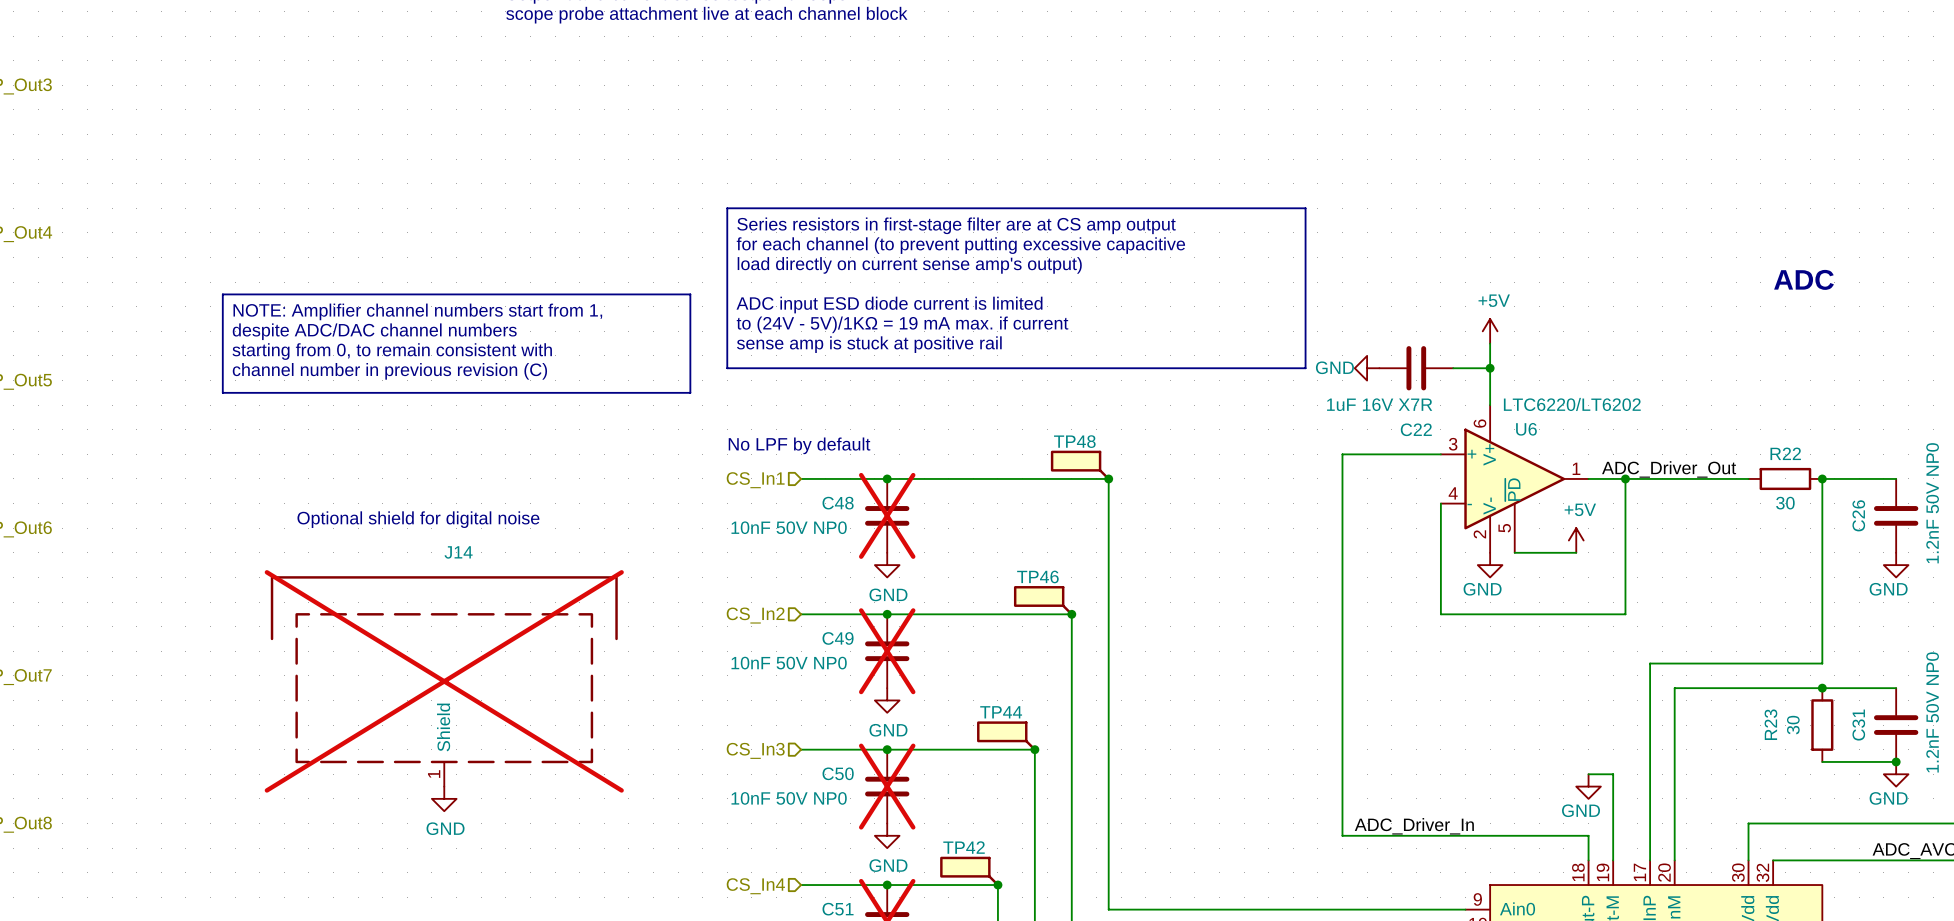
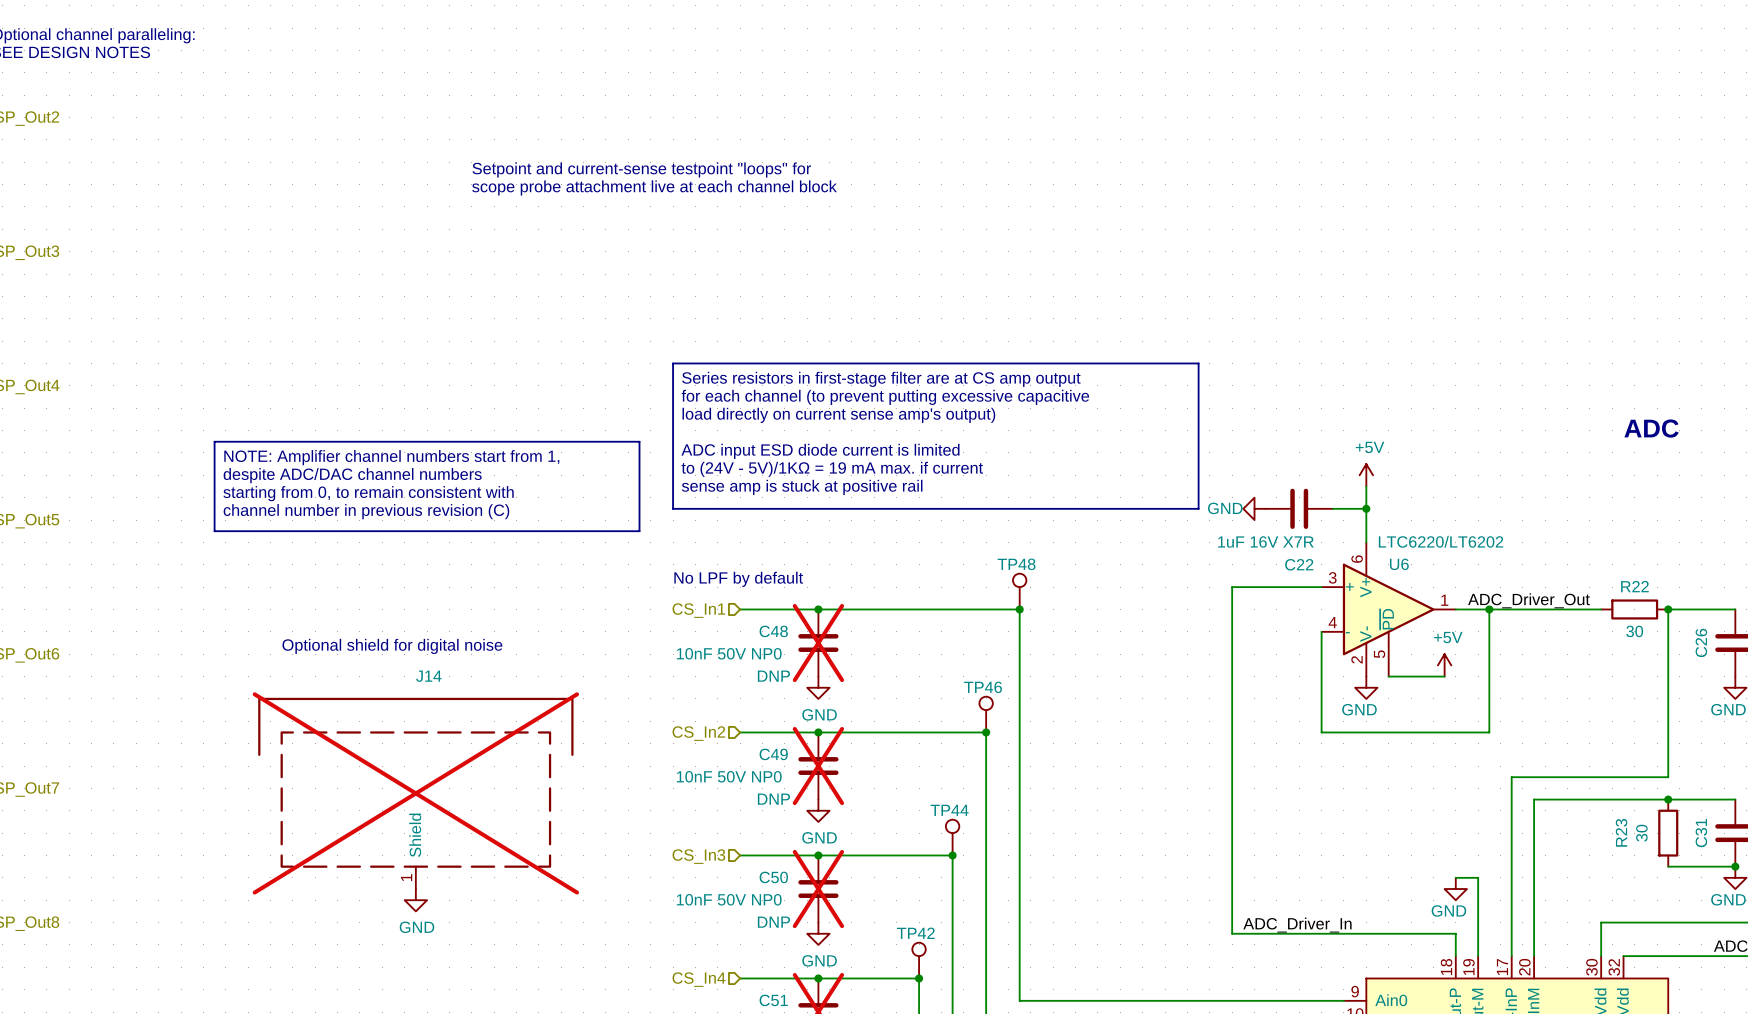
TP48 symbol: [1050, 450, 1110, 481] -> [1012, 573, 1027, 610]
C48 text: none -> DNP (773, 676)
TP46 symbol: [1013, 586, 1074, 616] -> [979, 696, 993, 733]
C49 text: none -> DNP (773, 799)
TP44 symbol: [977, 721, 1037, 751] -> [945, 819, 960, 856]
C50 text: none -> DNP (773, 922)
TP42 symbol: [940, 856, 1000, 887] -> [912, 942, 926, 979]

